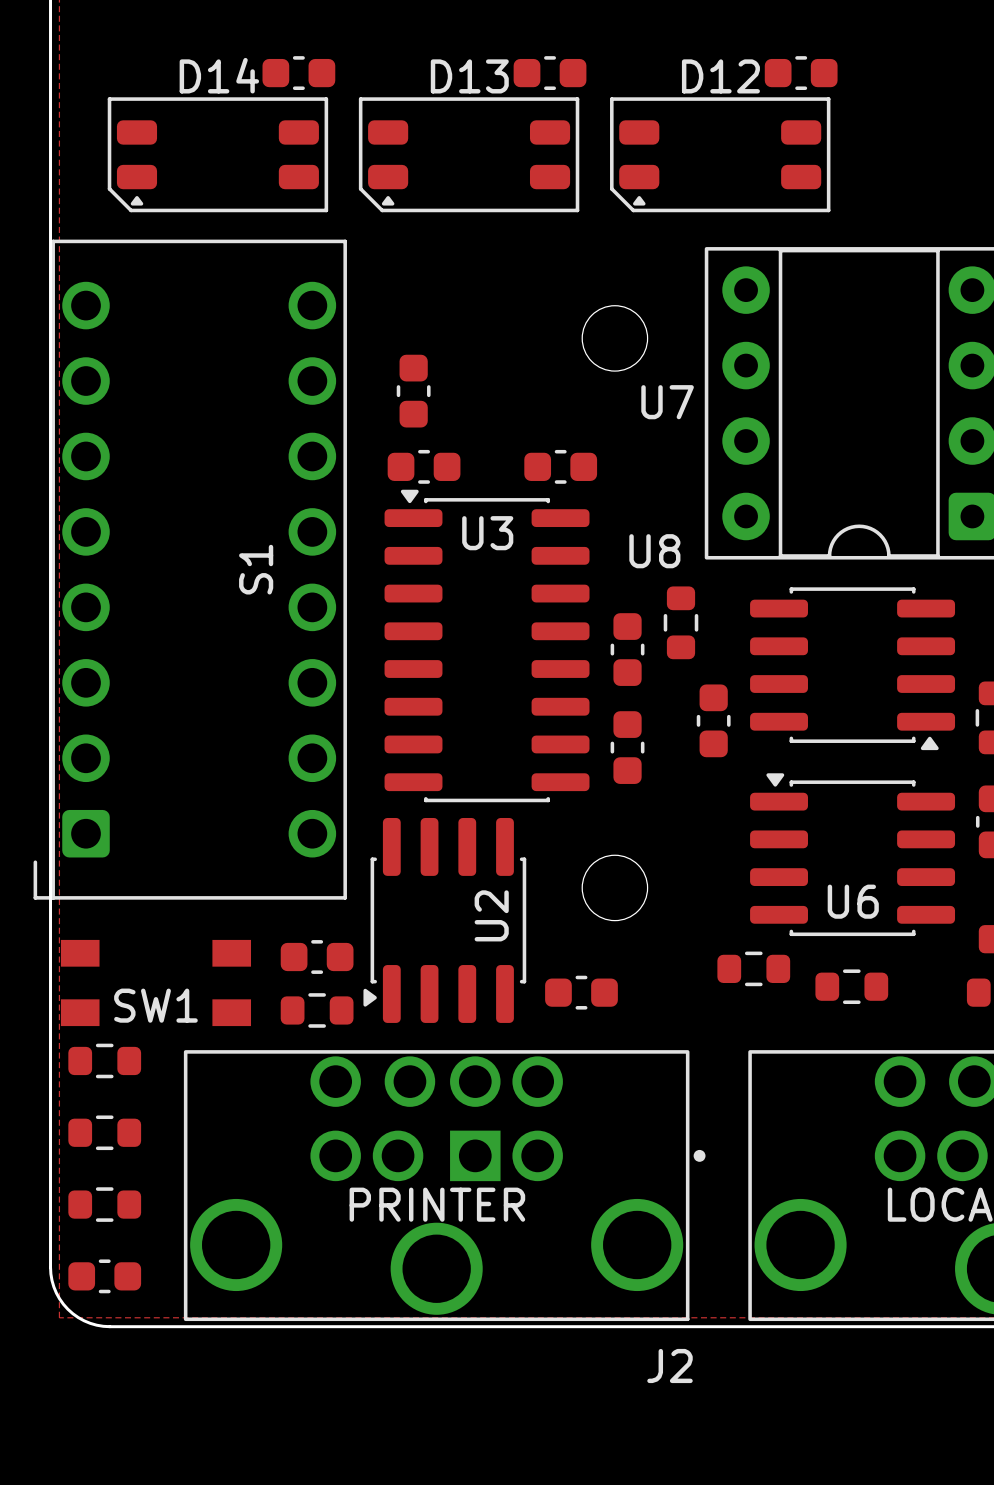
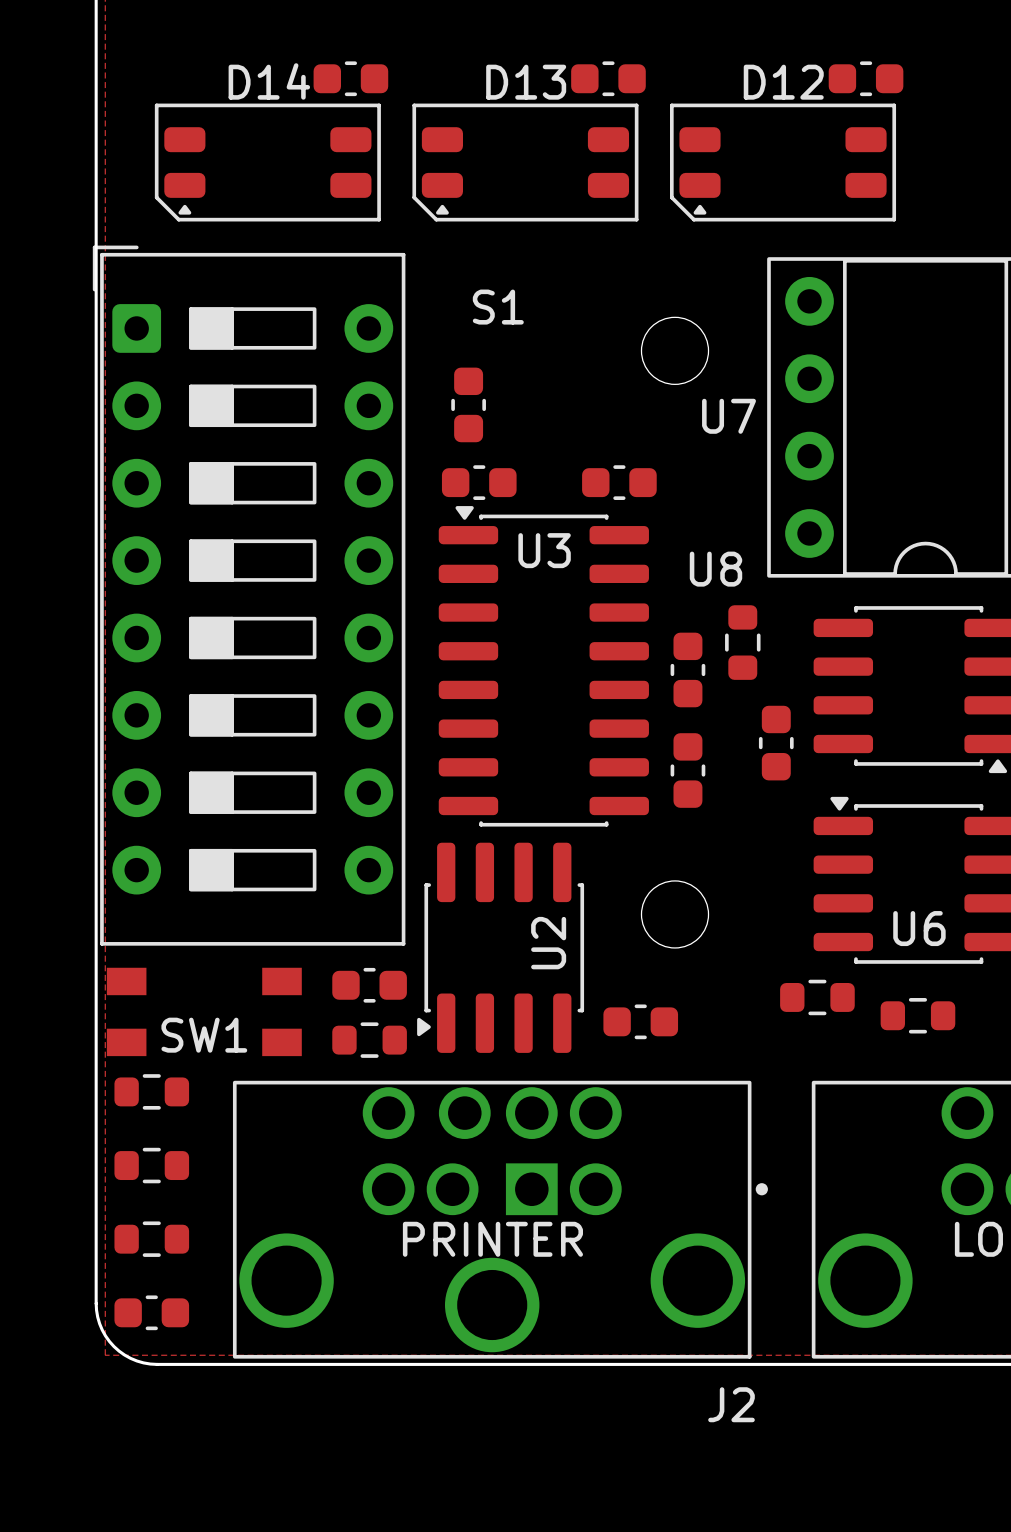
S1 footprint: [33, 239, 347, 900] -> [92, 245, 406, 946]
S1 name position: S1 (256, 569) -> S1 (498, 307)

